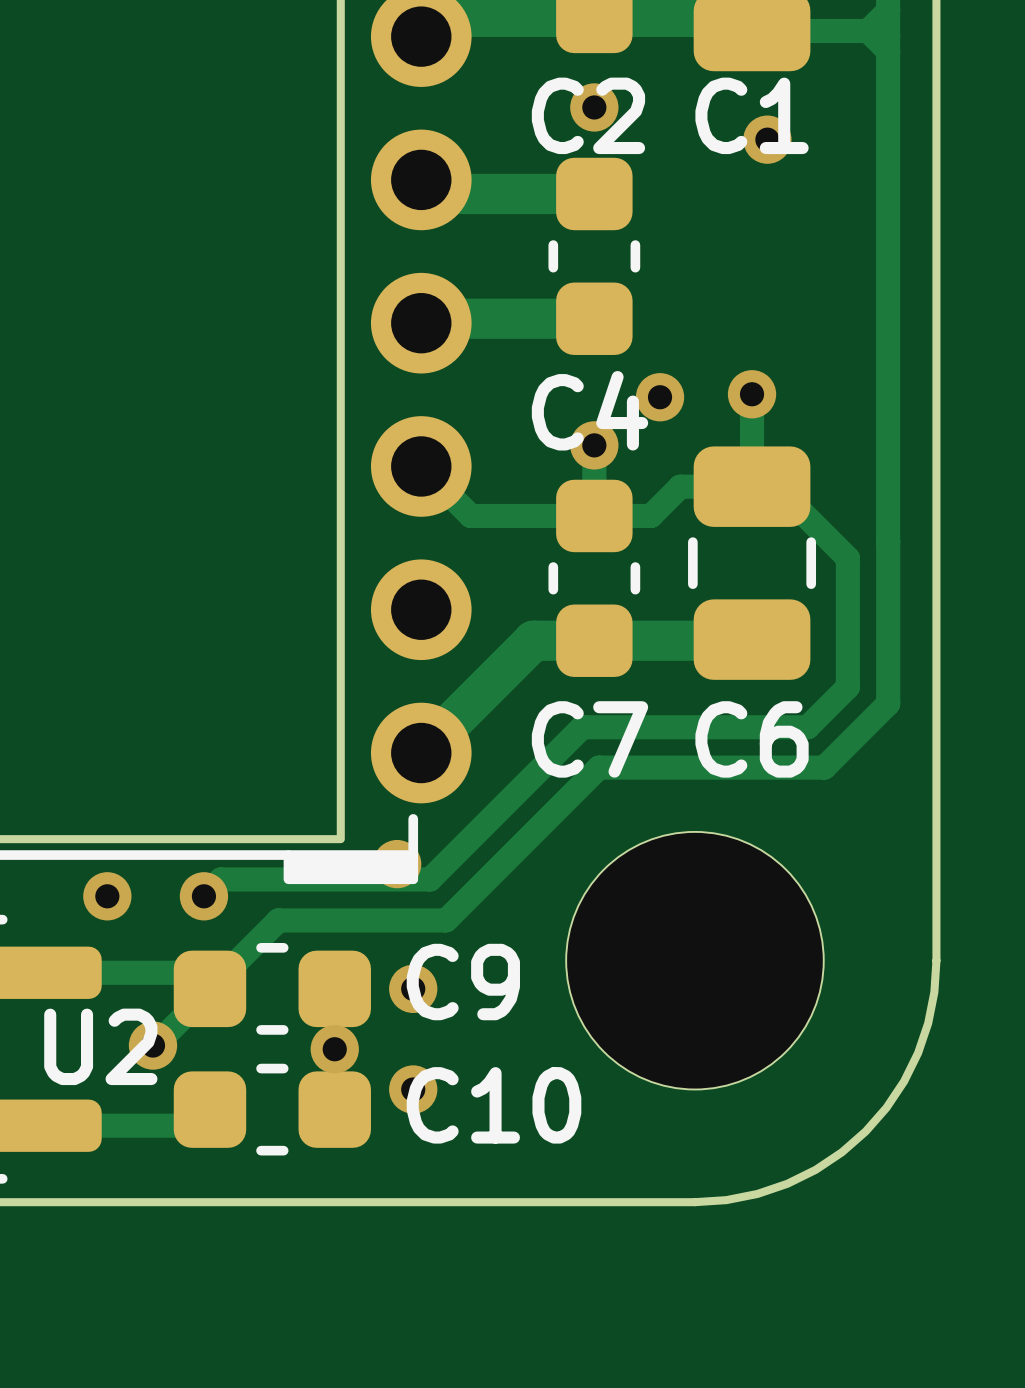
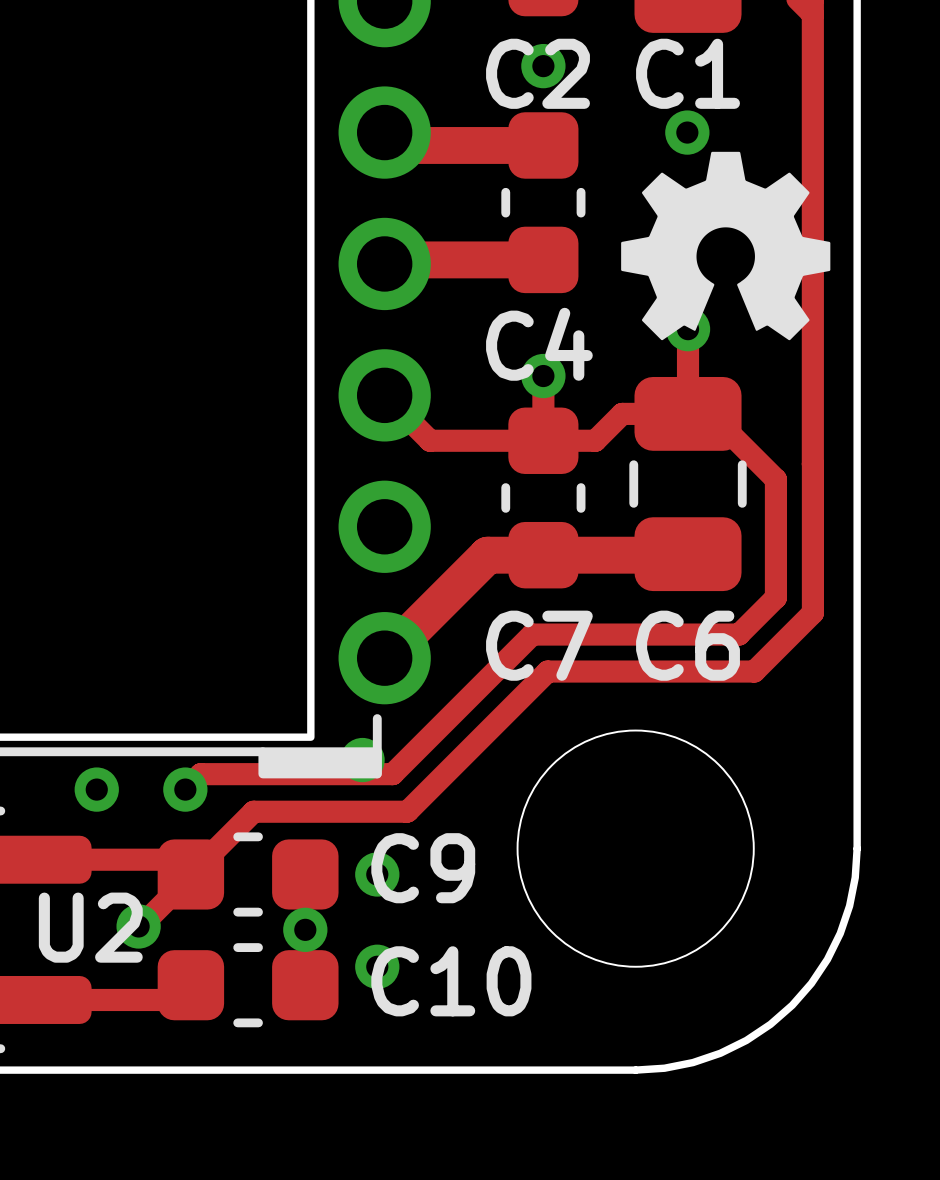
via position: (767, 139) -> (687, 132)
drawing: none -> [621, 151, 831, 341]
via: (660, 397) -> none

